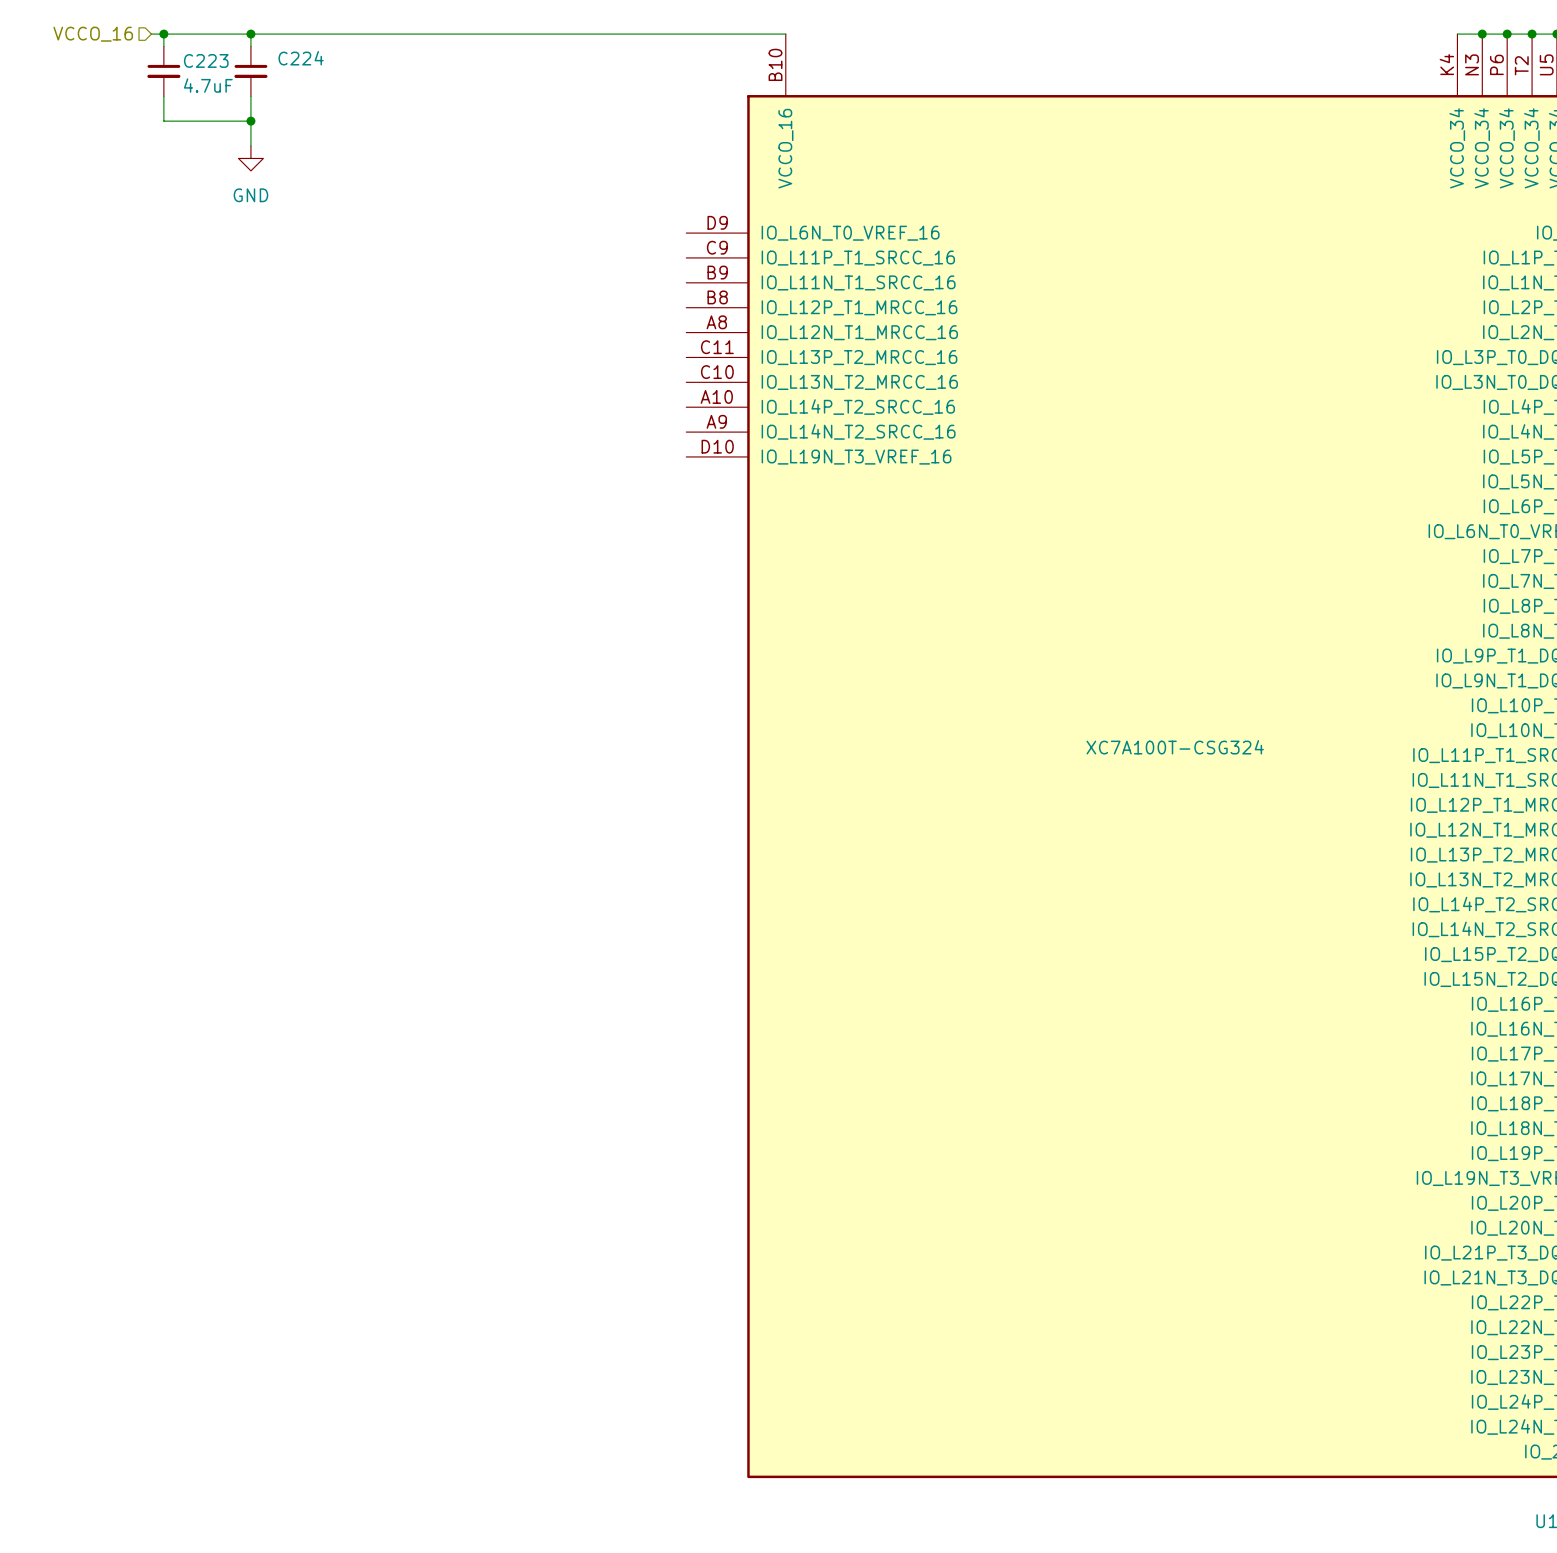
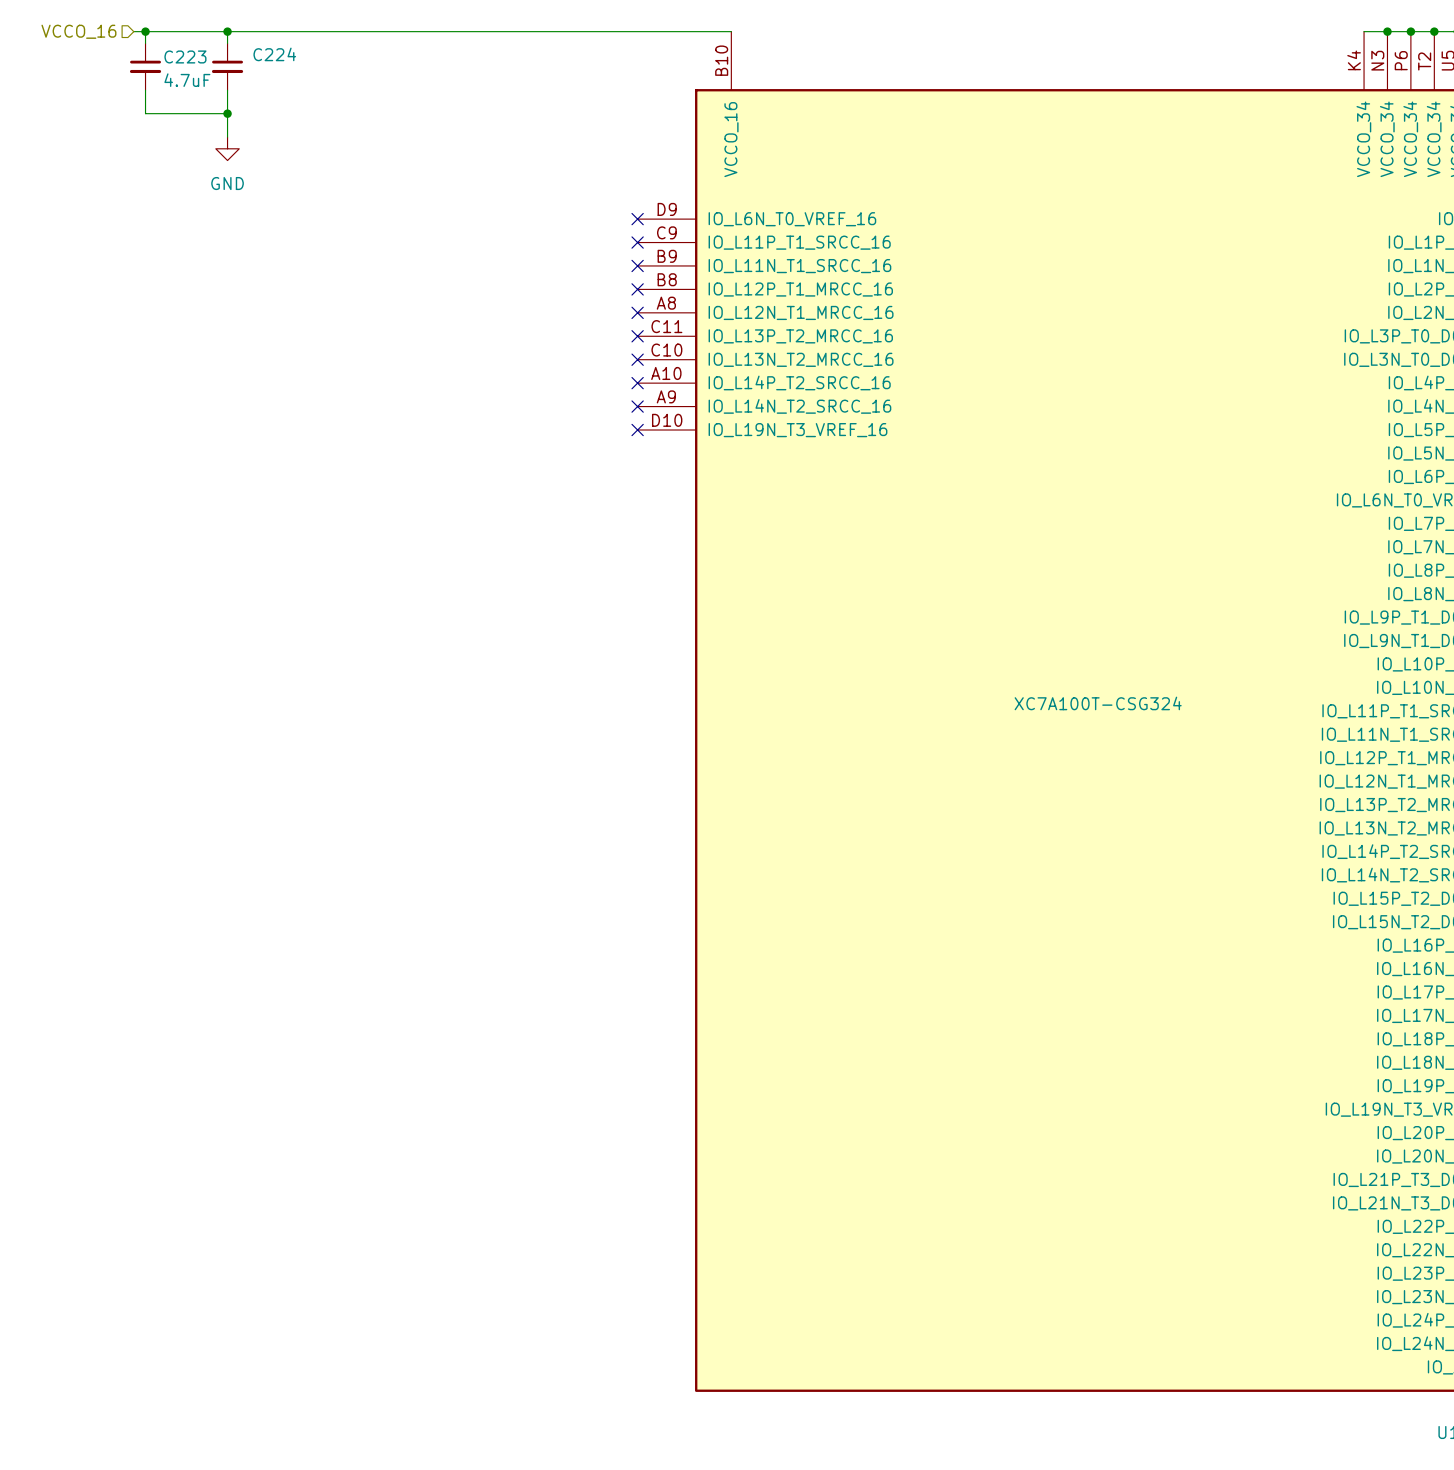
no-connect mark: none -> (637, 219)
no-connect mark: none -> (637, 242)
no-connect mark: none -> (637, 265)
no-connect mark: none -> (637, 289)
no-connect mark: none -> (637, 312)
no-connect mark: none -> (637, 336)
no-connect mark: none -> (637, 359)
no-connect mark: none -> (637, 383)
no-connect mark: none -> (637, 406)
no-connect mark: none -> (637, 430)

